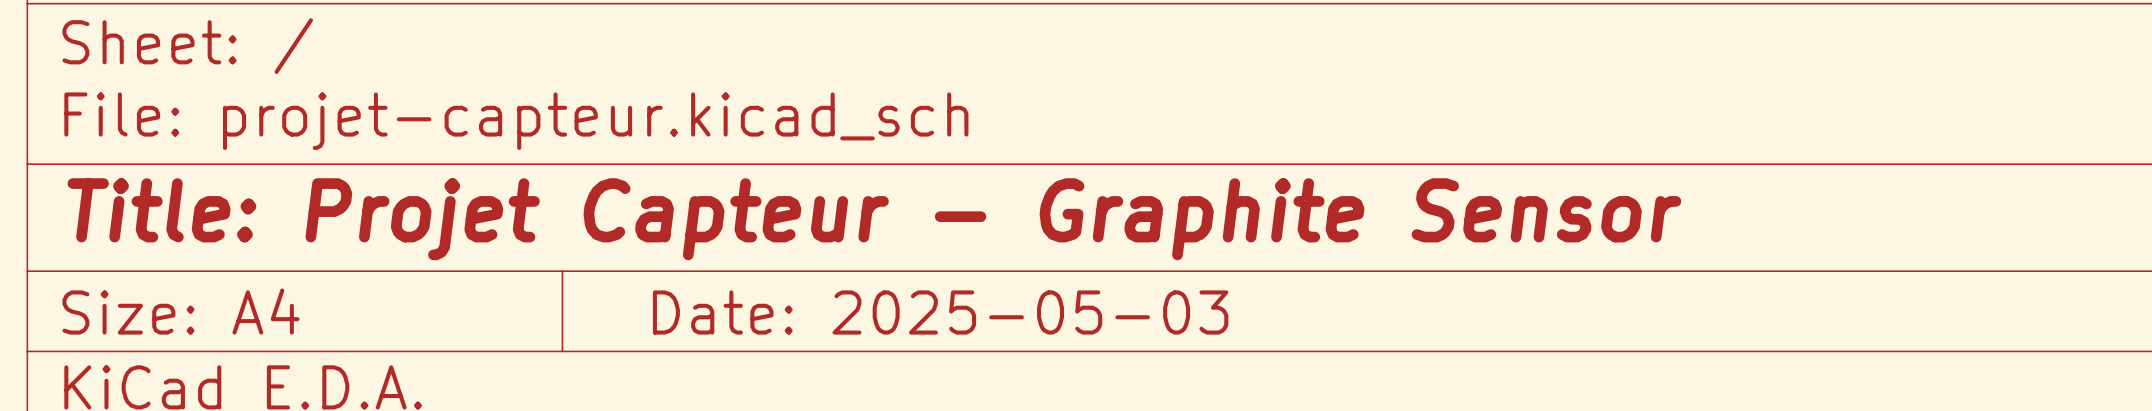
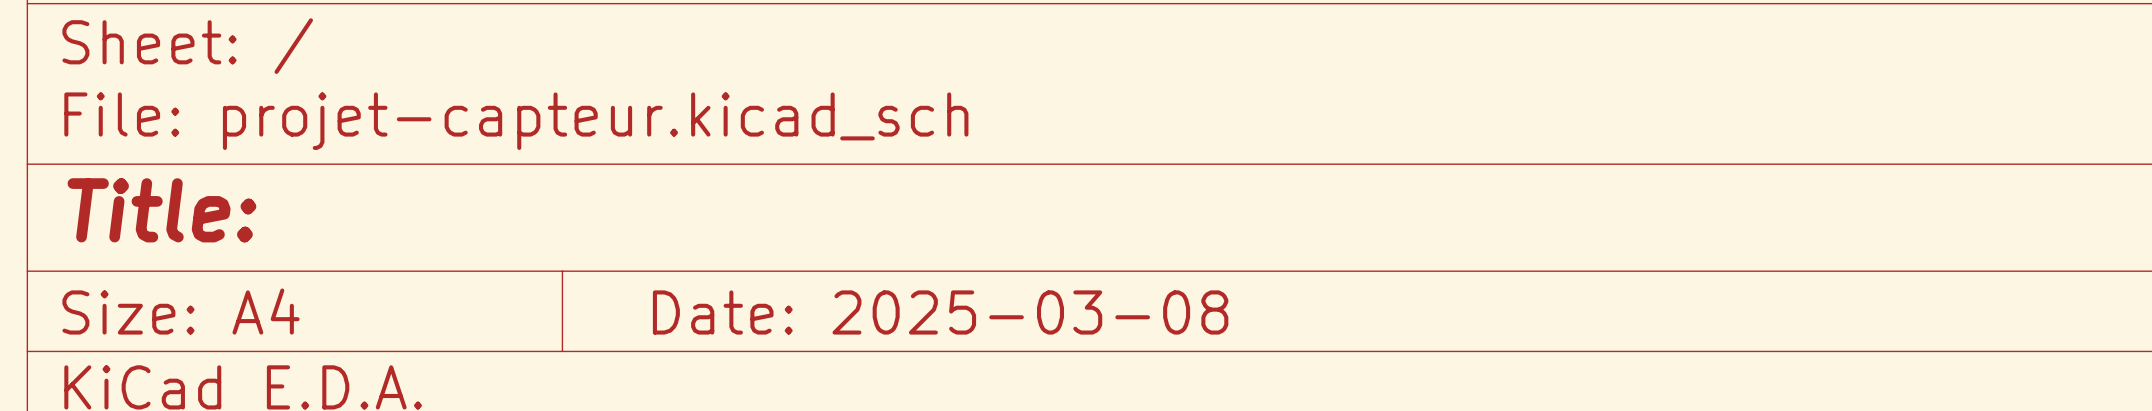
title block: Title: Projet Capteur - Graphite Sensor (874, 219) -> Title: (161, 210)
title block: Date: 2025-05-03 (940, 312) -> Date: 2025-03-08 (940, 312)

